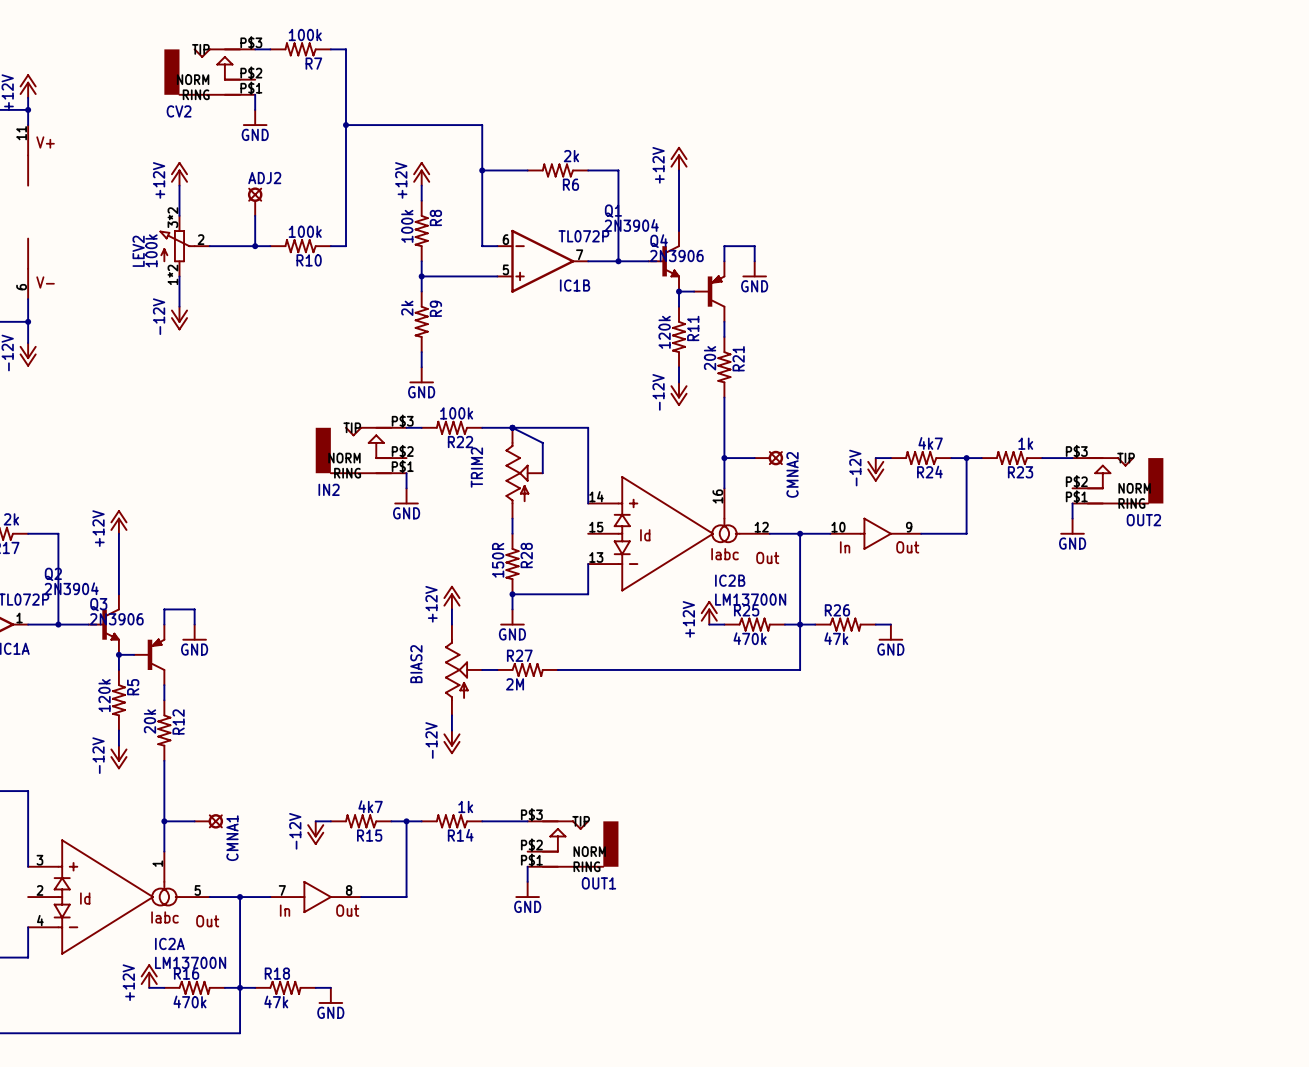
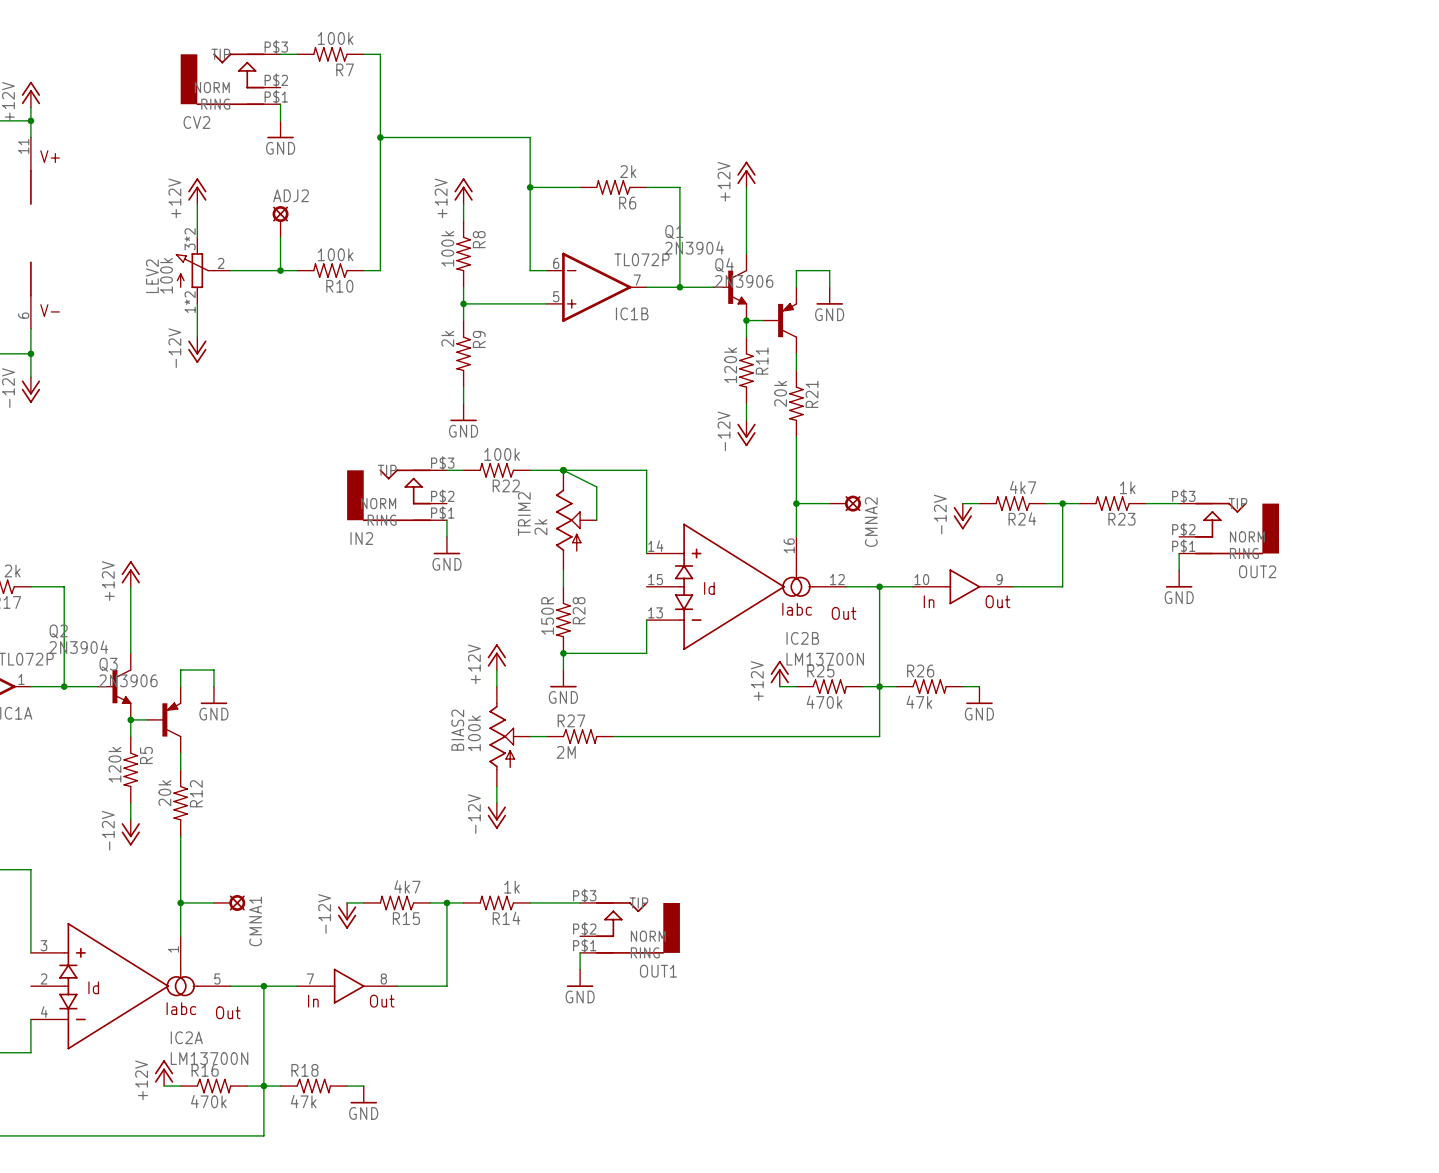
TRIM2 value: none -> 2k (540, 527)
BIAS2 value: none -> 100k (474, 733)

